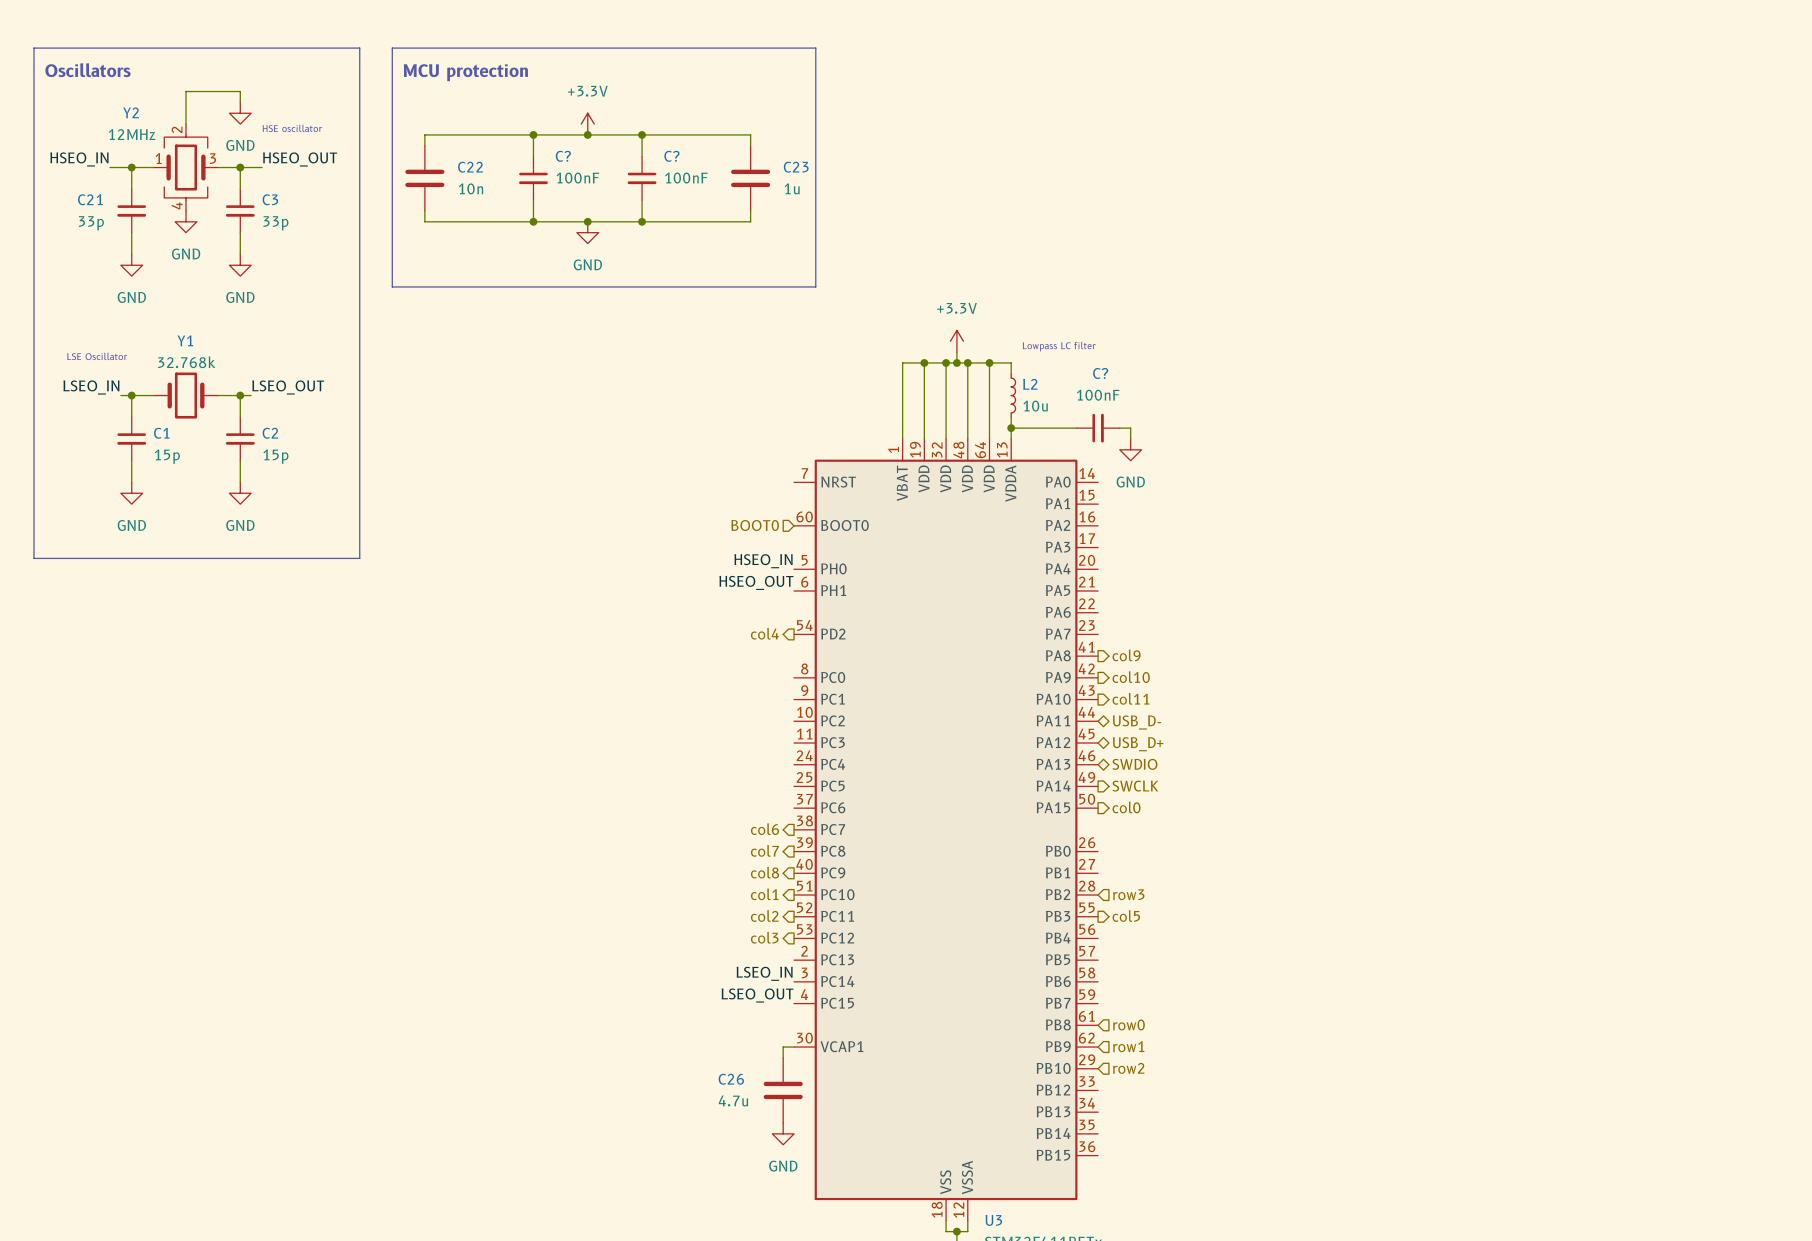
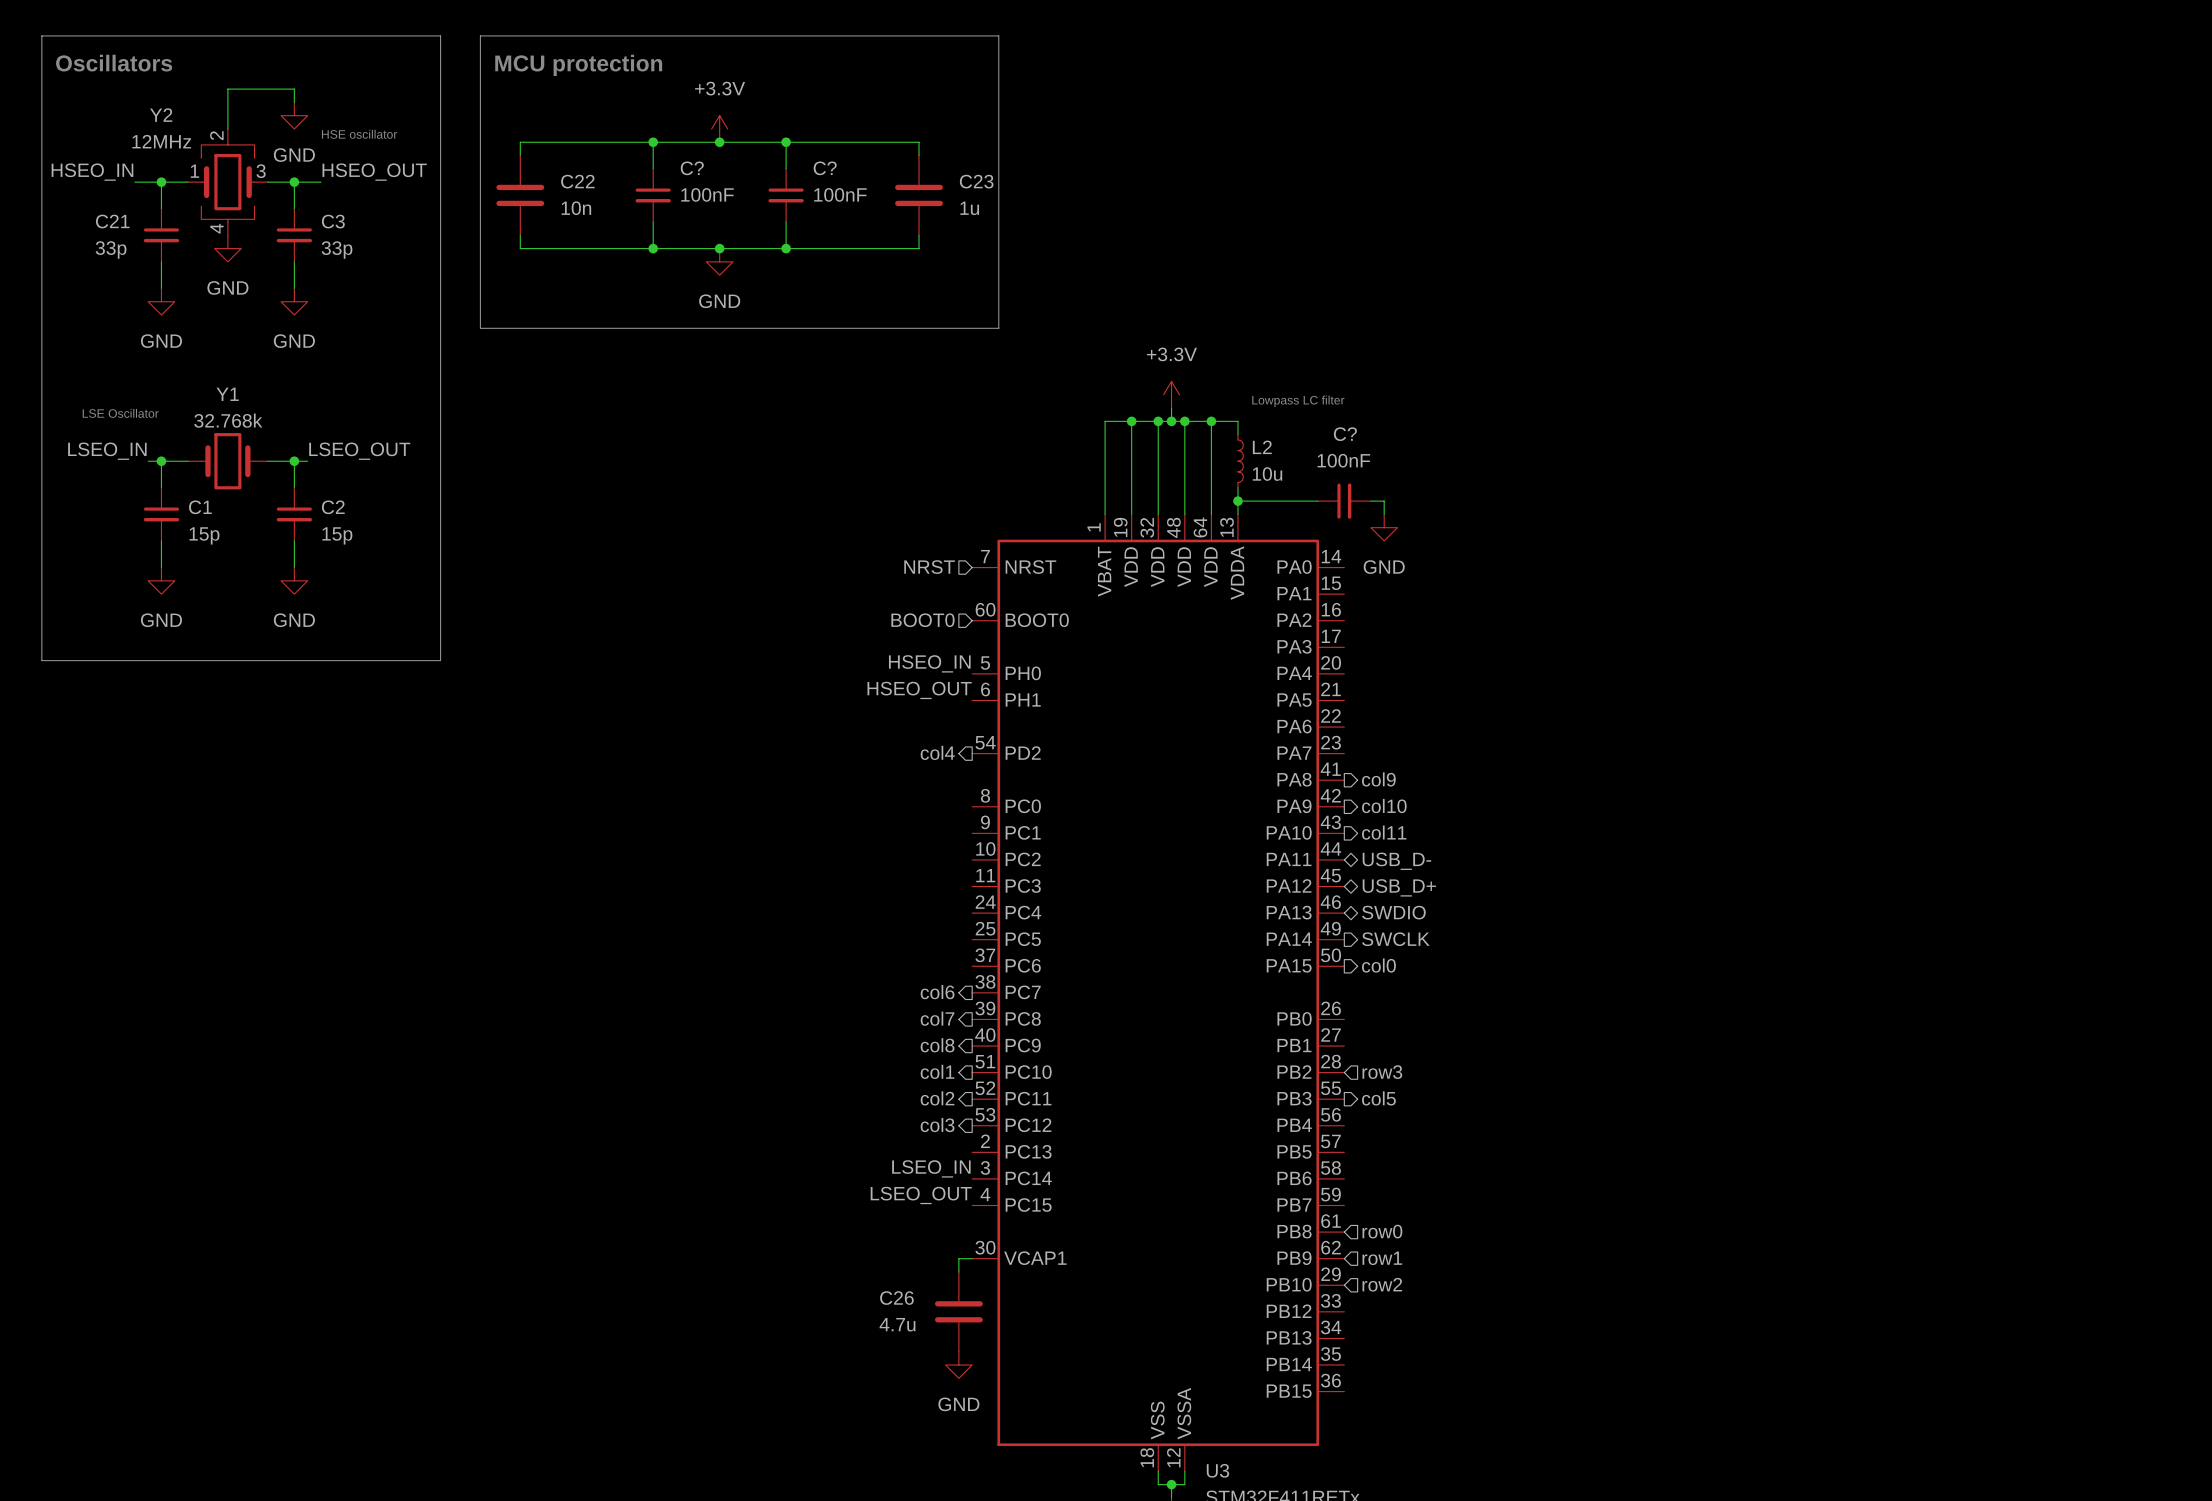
hierarchical label: none -> NRST (929, 567)

